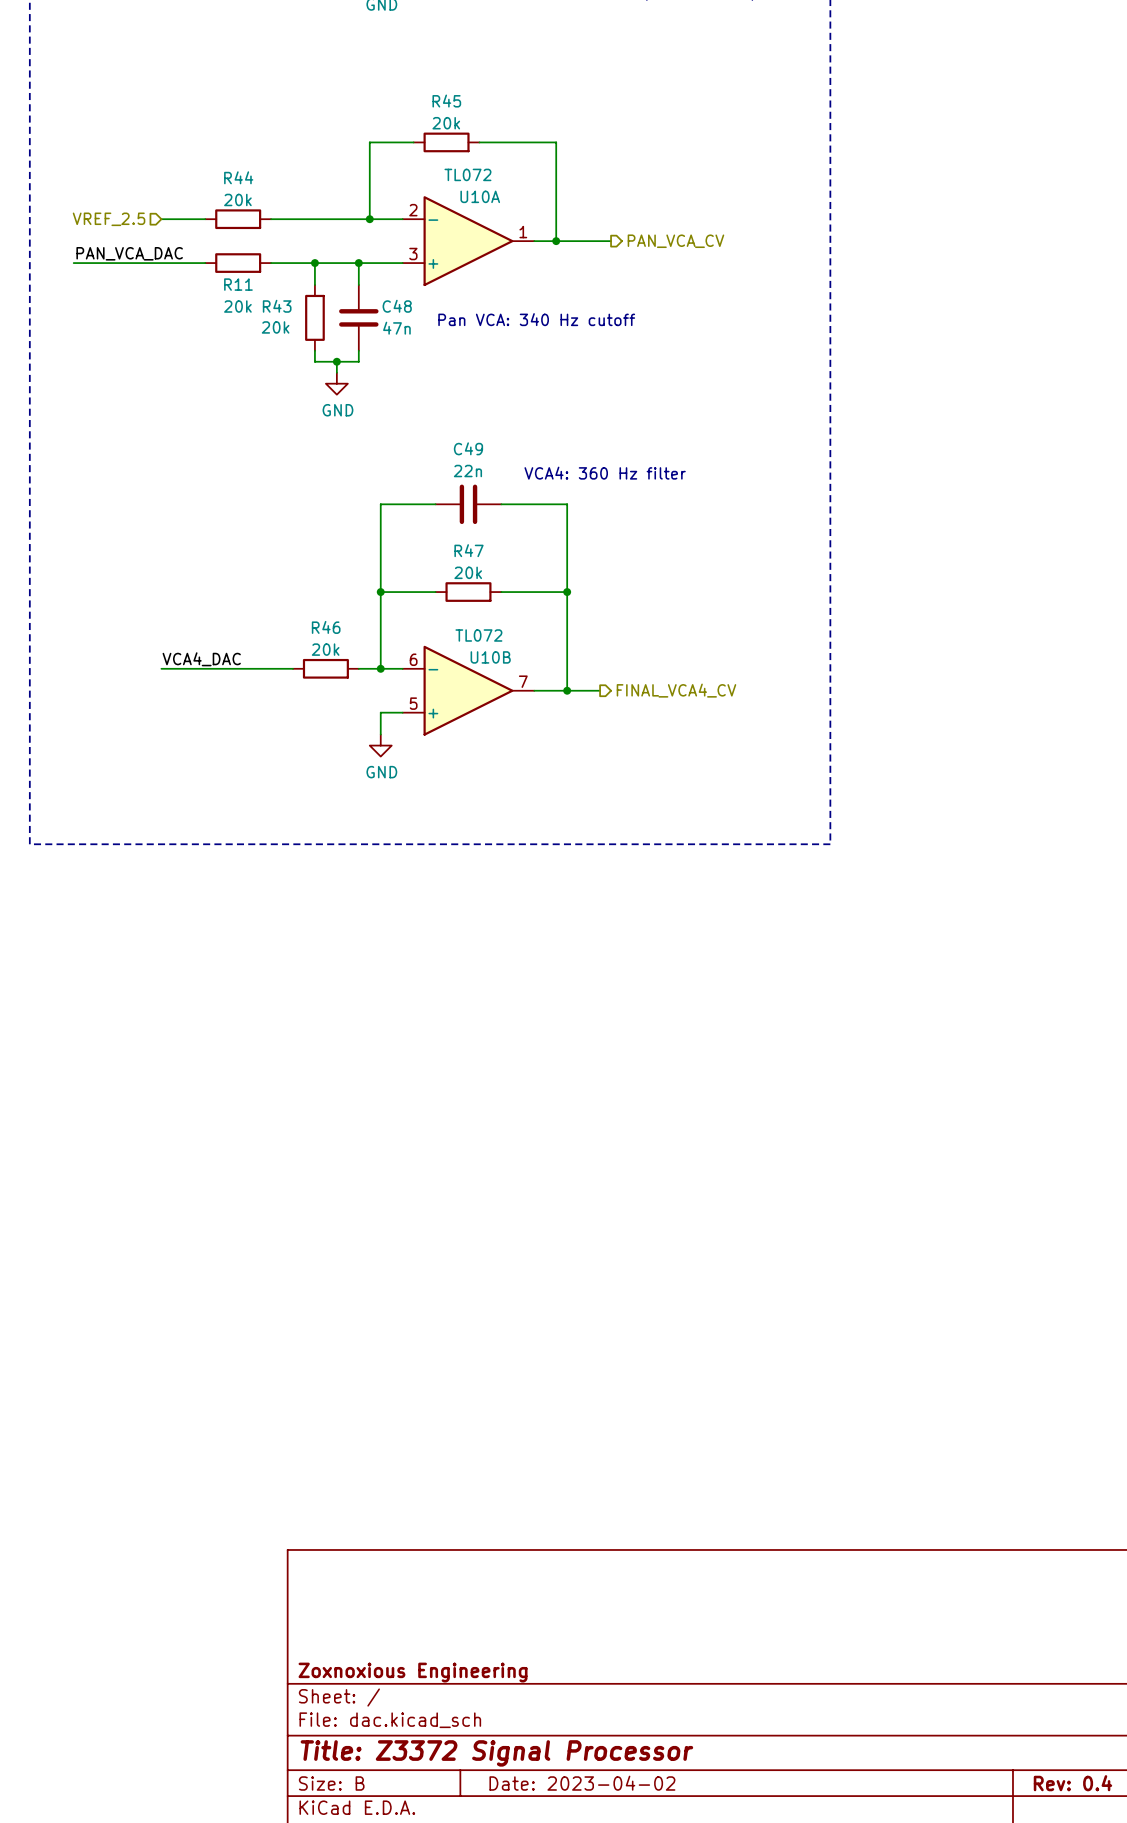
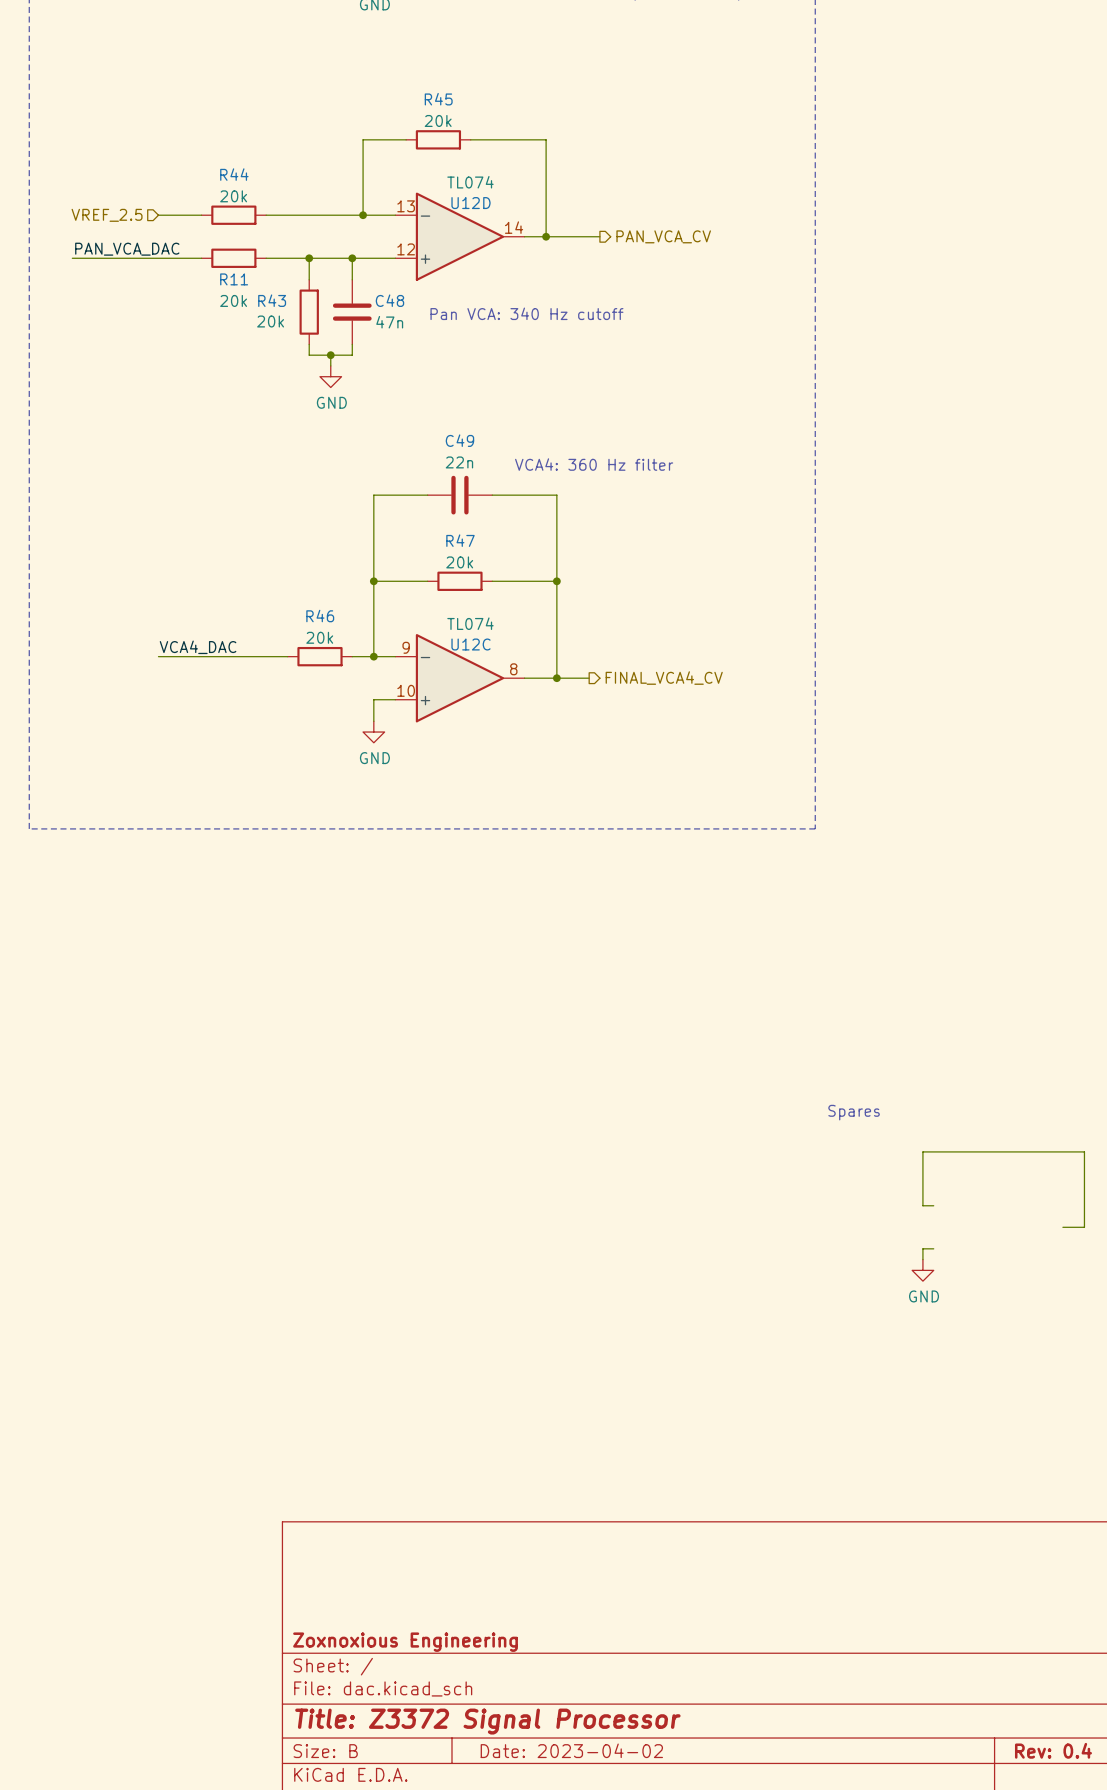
U10A value: TL072 (467, 174) -> TL074 (470, 182)
U10A name: U10A (480, 196) -> U12D (470, 203)
U10A pin number: 2 (413, 210) -> 13 (406, 206)
U10A pin number: 1 (523, 232) -> 14 (514, 227)
U10A pin number: 3 (413, 254) -> 12 (406, 249)
U10B value: TL072 (478, 635) -> TL074 (470, 623)
U10B name: U10B (490, 657) -> U12C (470, 644)
U10B pin number: 6 (413, 659) -> 9 (406, 647)
U10B pin number: 7 (523, 681) -> 8 (513, 669)
U10B pin number: 5 (413, 703) -> 10 (406, 690)
text: none -> Spares (854, 1112)
wire: none -> (933, 1205) (922, 1205) (922, 1151) (1084, 1151) (1084, 1227) (1062, 1227)
wire: none -> (933, 1248) (922, 1248) (922, 1259)
power symbol: none -> GND (922, 1270)

